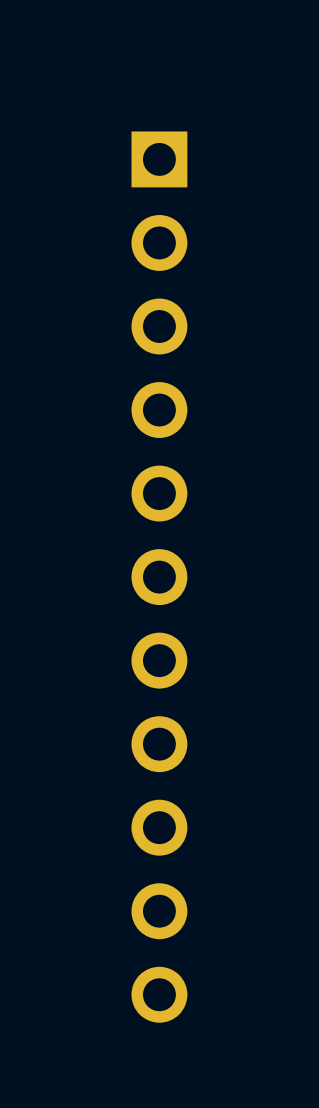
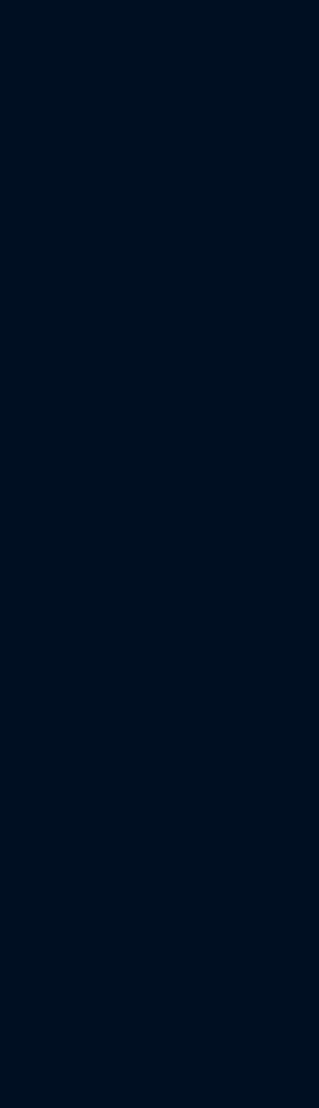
part: (159, 577) -> none

